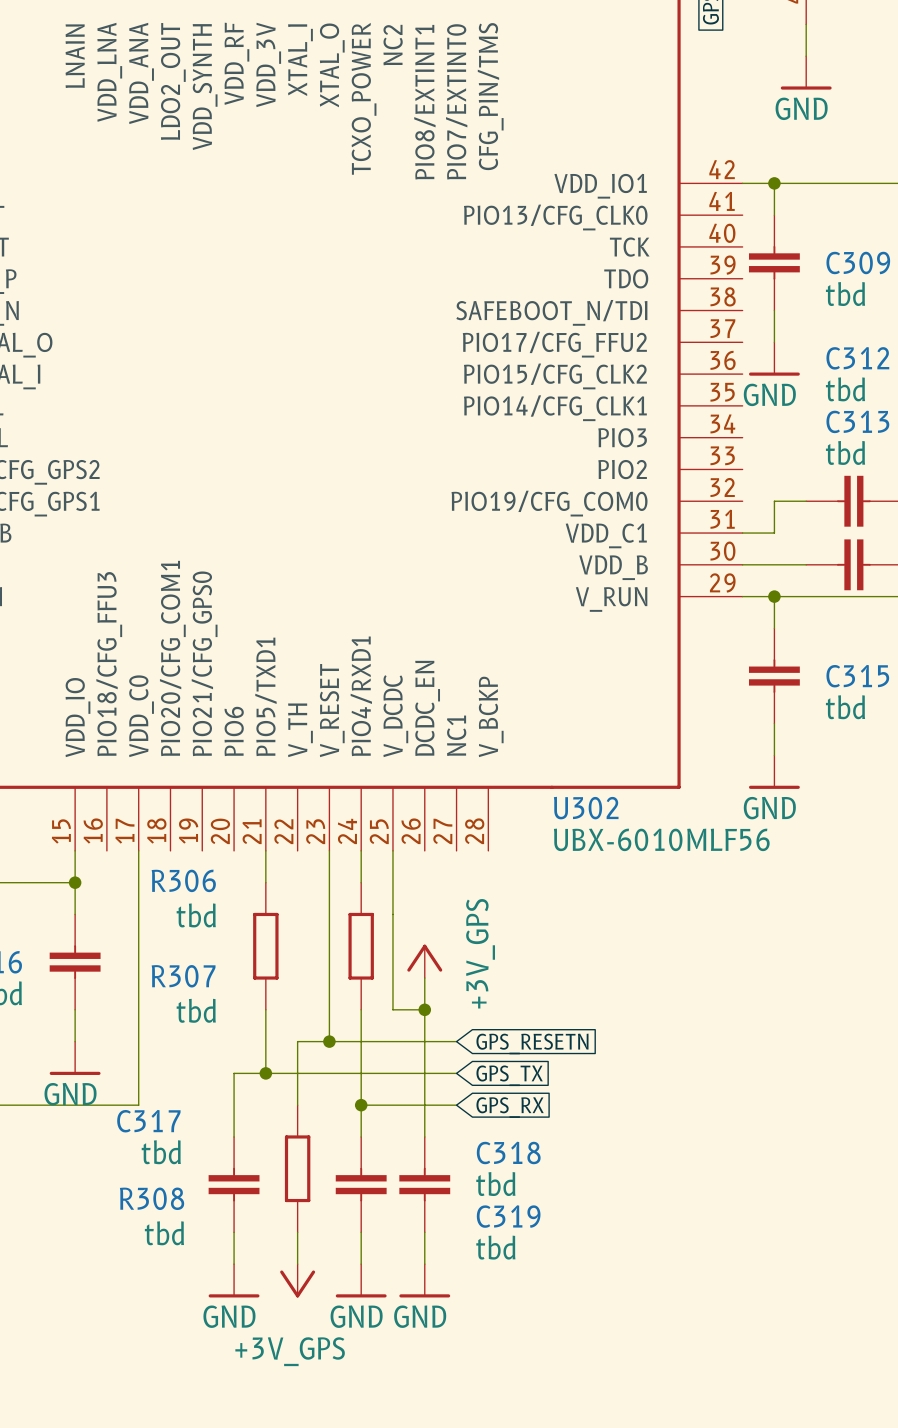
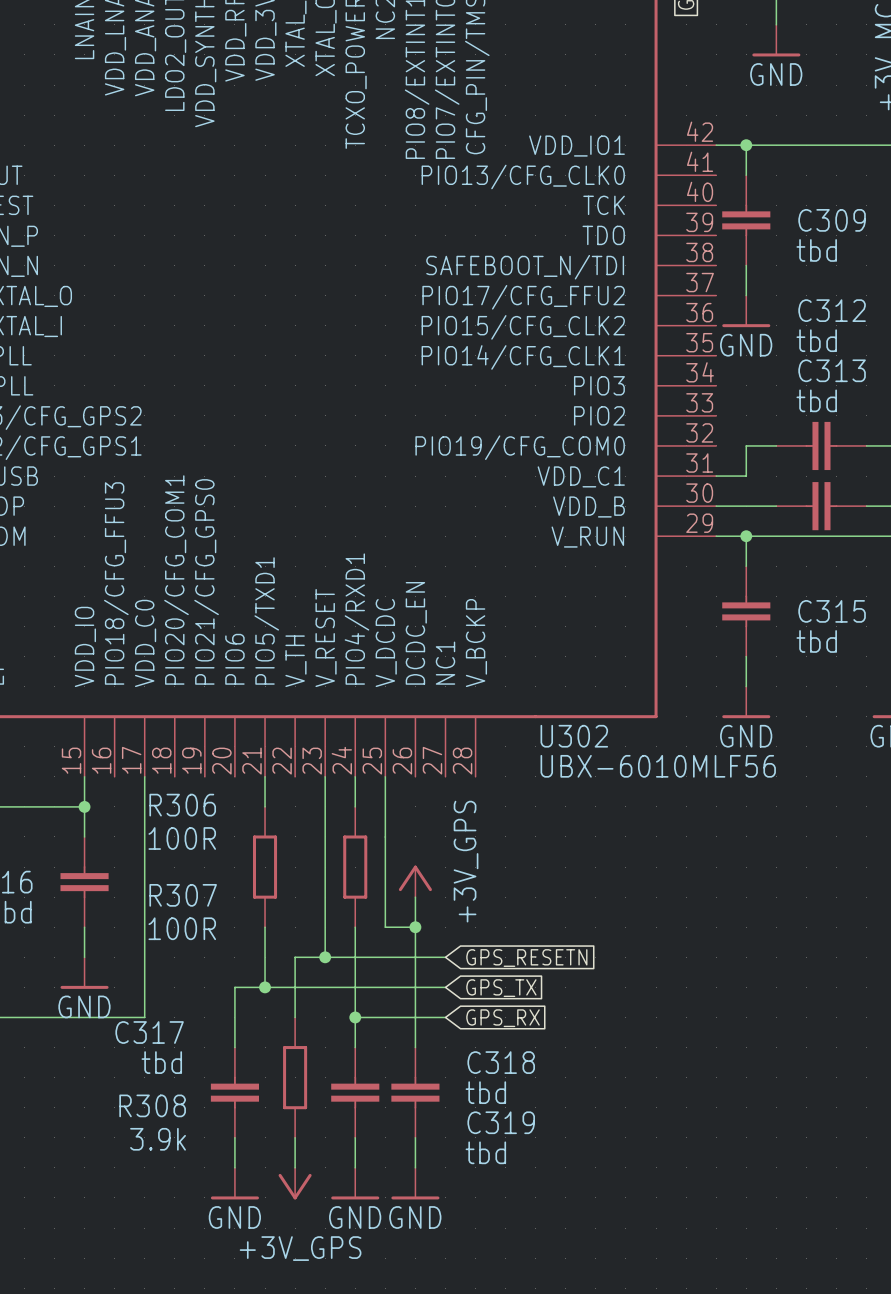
R306 value: tbd (196, 915) -> 100R (182, 838)
R307 value: tbd (196, 1010) -> 100R (182, 928)
R308 value: tbd (164, 1233) -> 3.9k (158, 1139)

